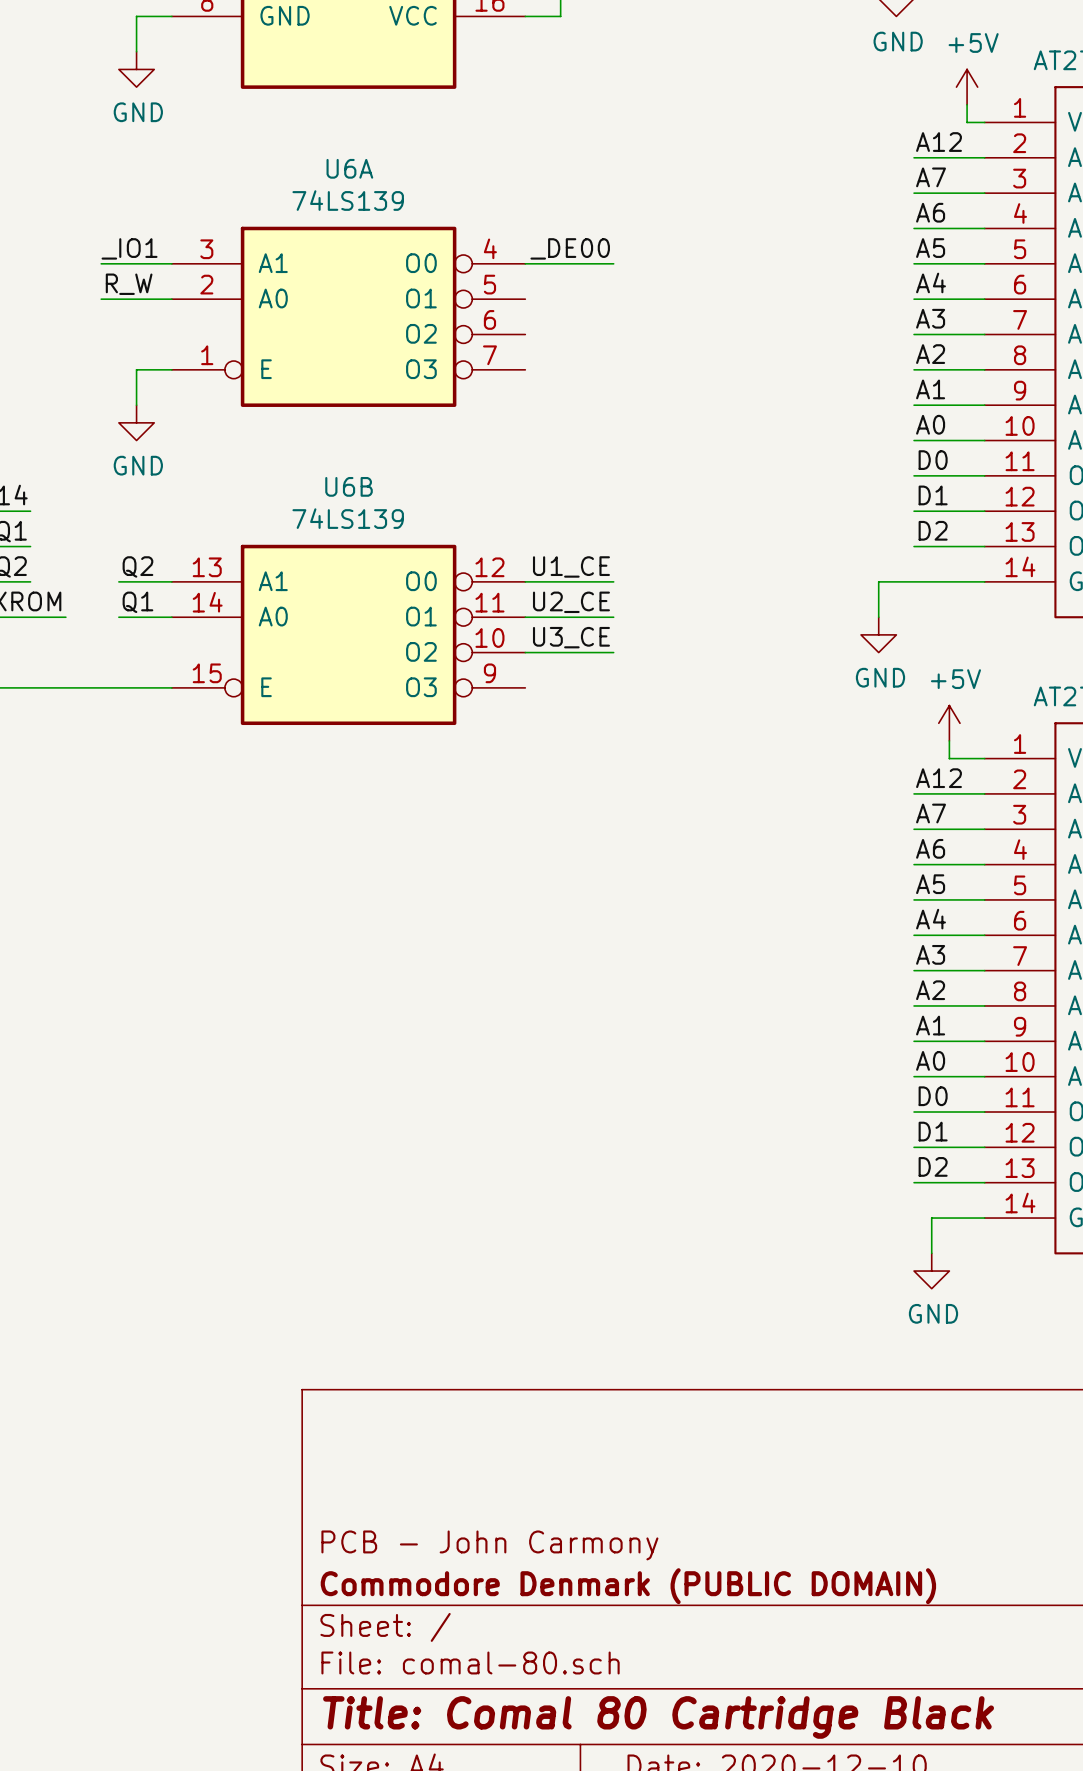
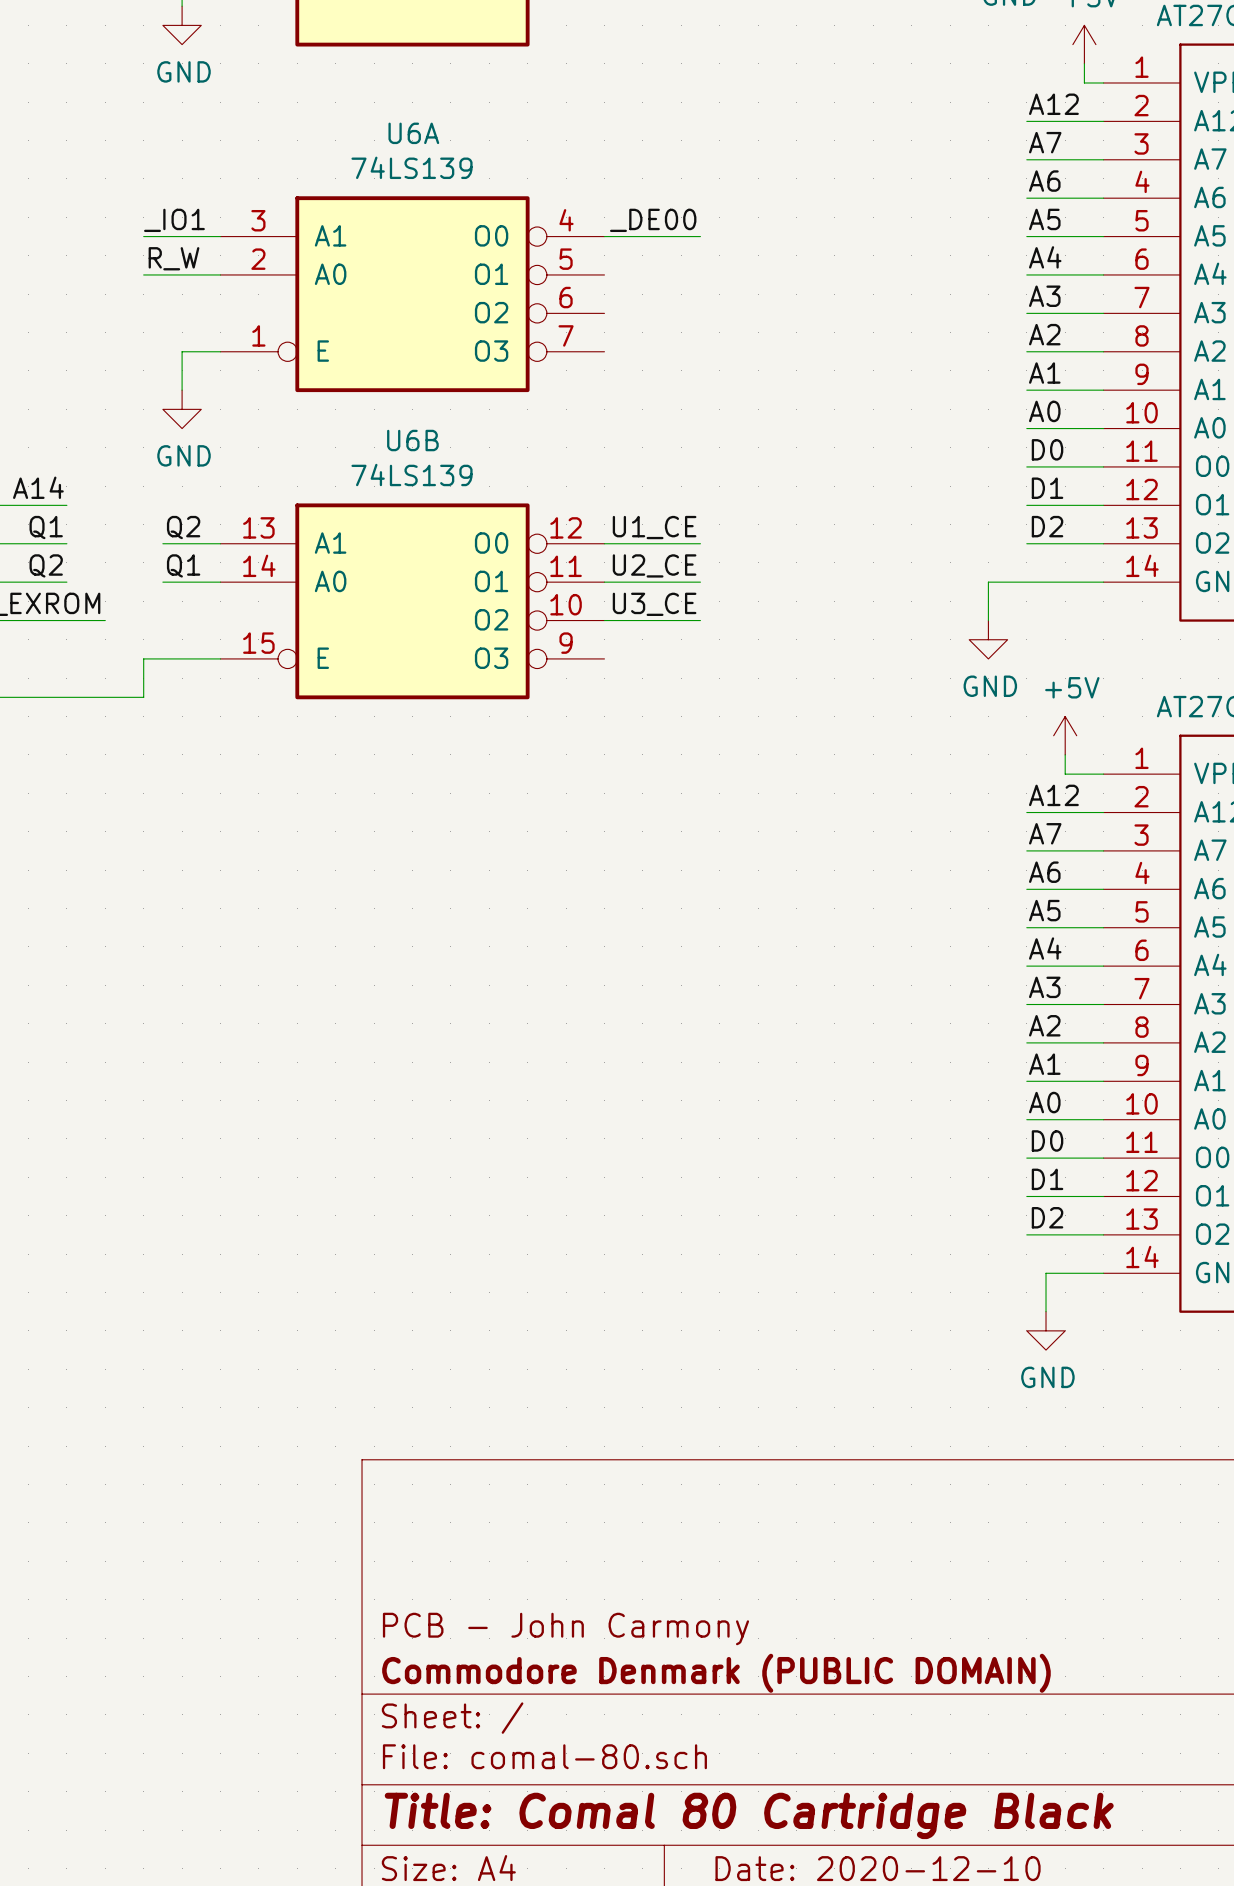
label: none -> Q2 (183, 527)
label: none -> U1_CE (654, 527)
label: Q2 (137, 566) -> Q1 (183, 565)
label: U1_CE (571, 566) -> U2_CE (654, 565)
label: Q1 (137, 602) -> none
label: U2_CE (571, 602) -> U3_CE (654, 604)
wire: (118, 617) (171, 617) -> (162, 543) (220, 543)
U6B position: (348, 634) -> (412, 601)
label: U3_CE (571, 637) -> none
wire: (525, 652) (613, 652) -> (604, 543) (700, 543)
wire: (101, 687) (171, 687) -> (143, 697) (143, 658) (220, 658)

